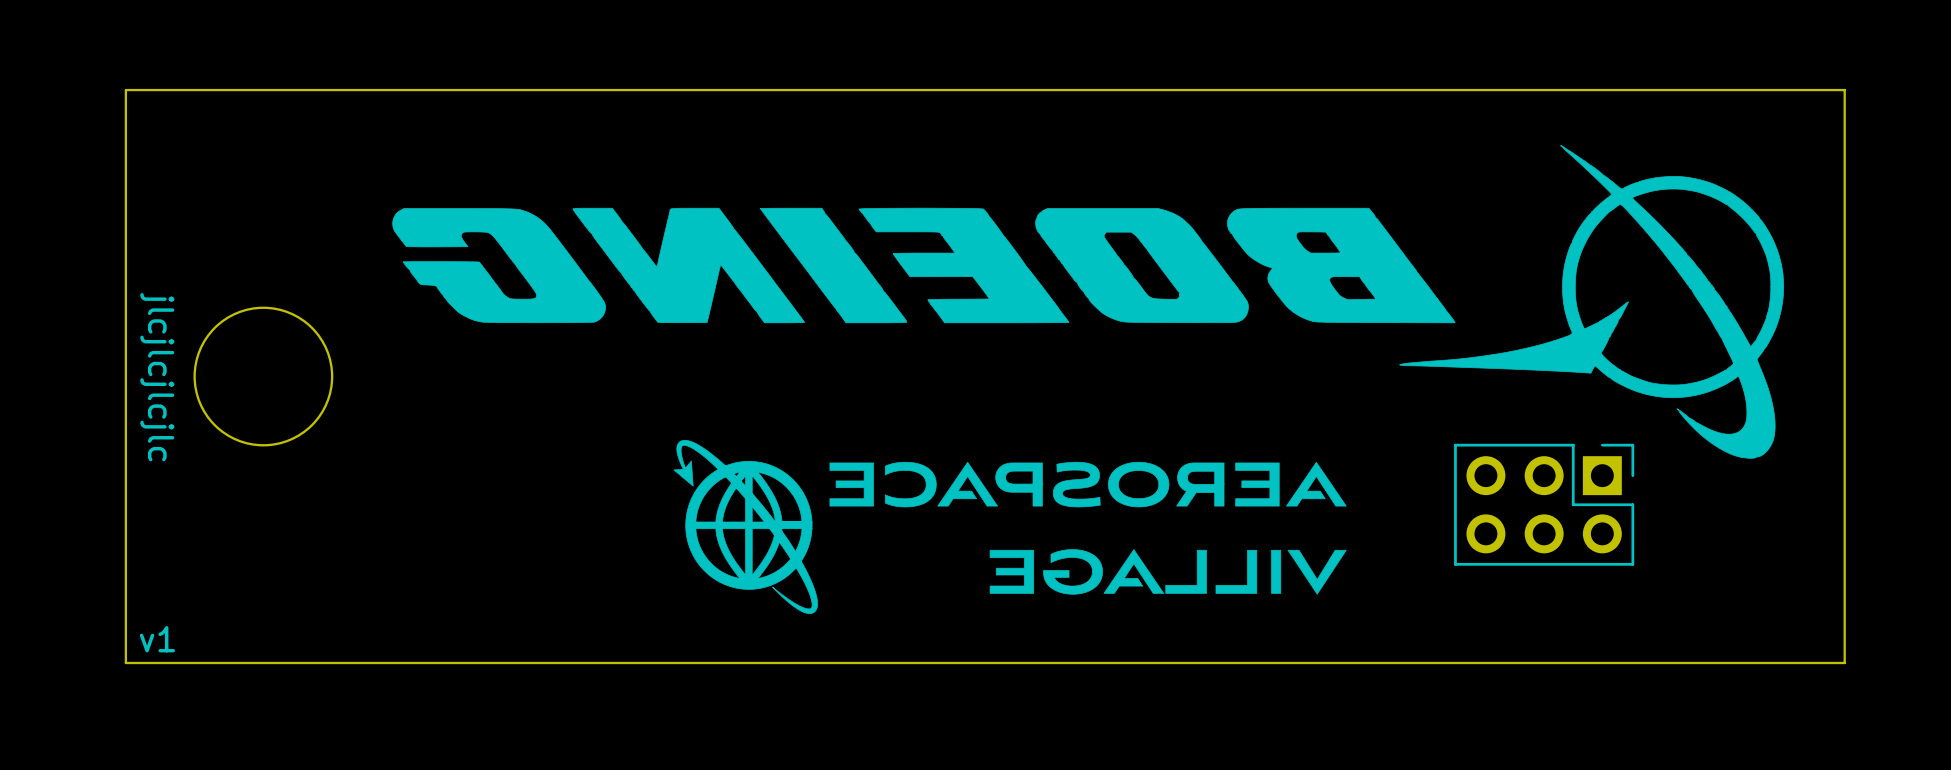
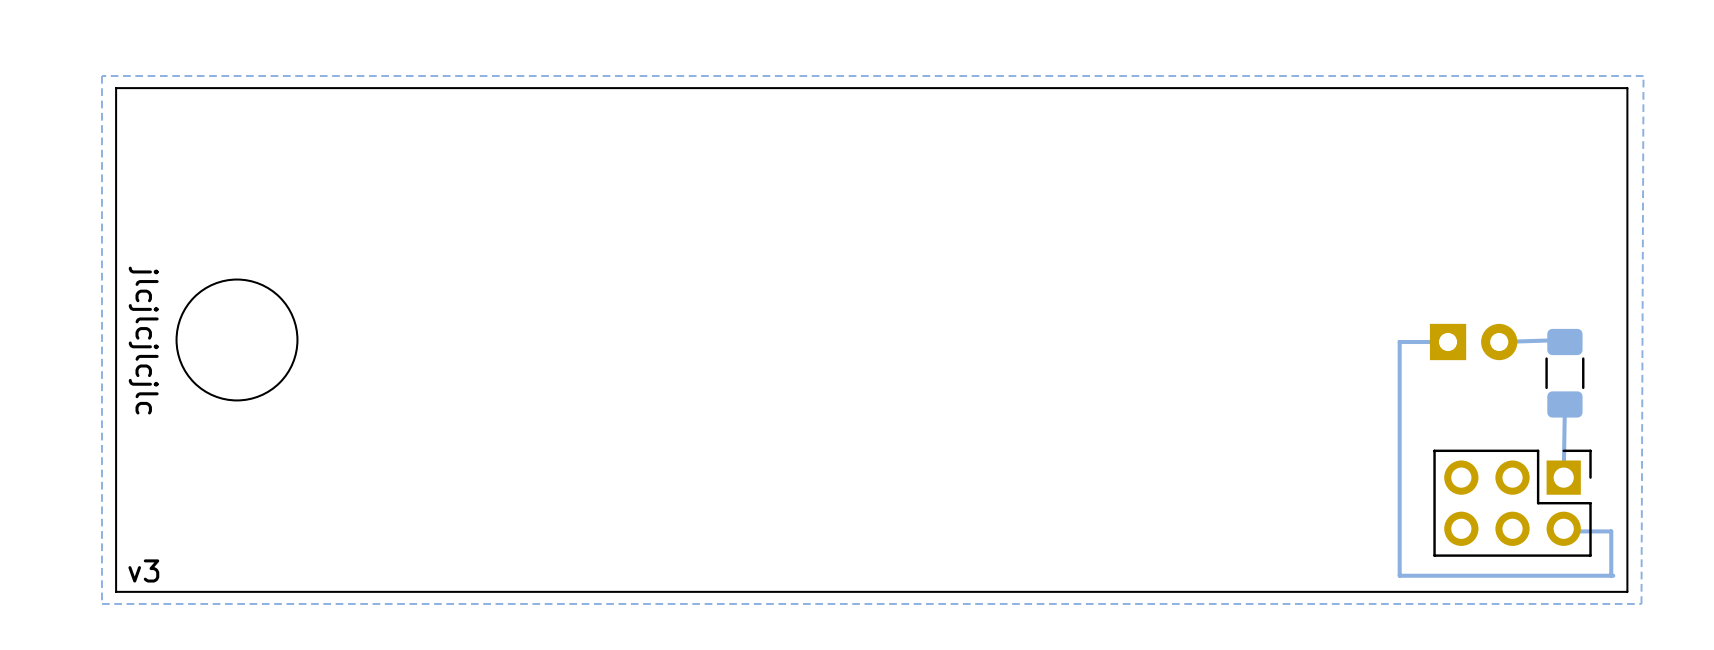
zone outline: none -> (1643, 76) (1641, 603) (101, 603) (101, 76) (1643, 76)
drawing: [392, 145, 1785, 459] -> none
track: none -> (1564, 339) (1500, 342)
track: none -> (1448, 342) (1399, 342) (1399, 575) (1613, 575)
part: none -> (1473, 342)
part: none -> (1564, 373)
drawing: [673, 439, 1347, 614] -> none
track: none -> (1564, 404) (1563, 477)
part position: (1544, 504) -> (1512, 503)
drawing: [989, 549, 1347, 595] -> none
track: none -> (1564, 531) (1611, 531) (1611, 575)
text: v1 (157, 639) -> v3 (143, 570)

